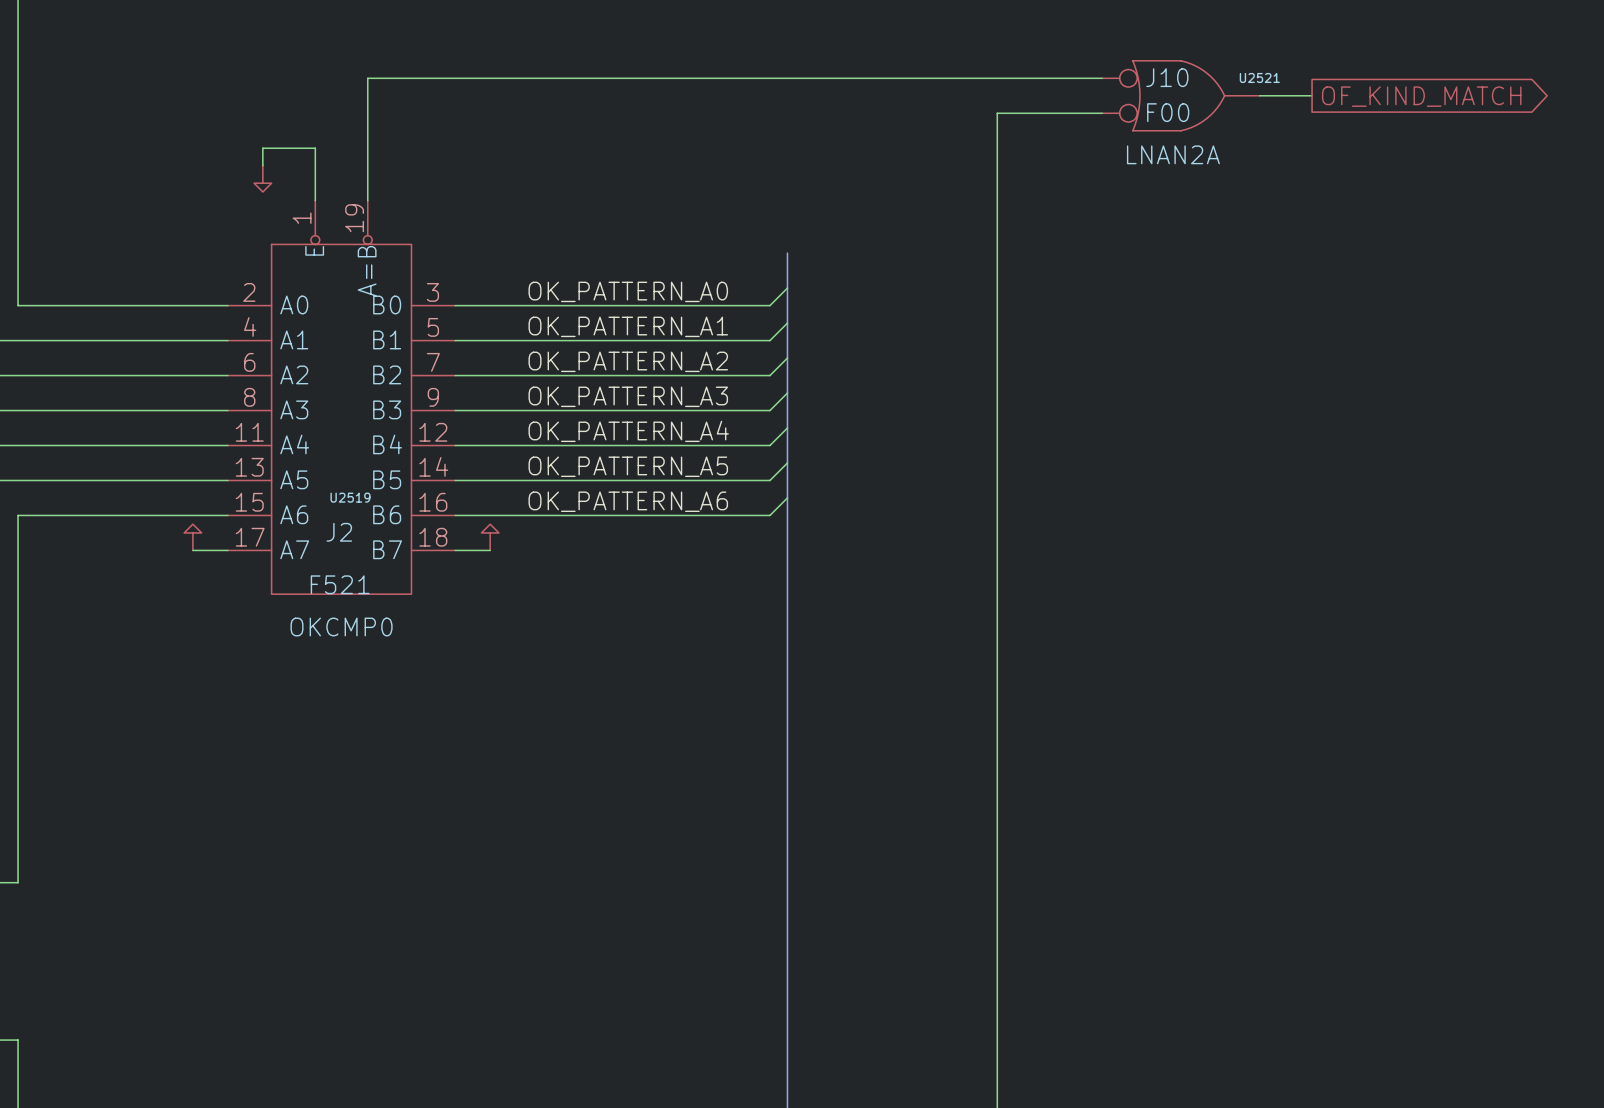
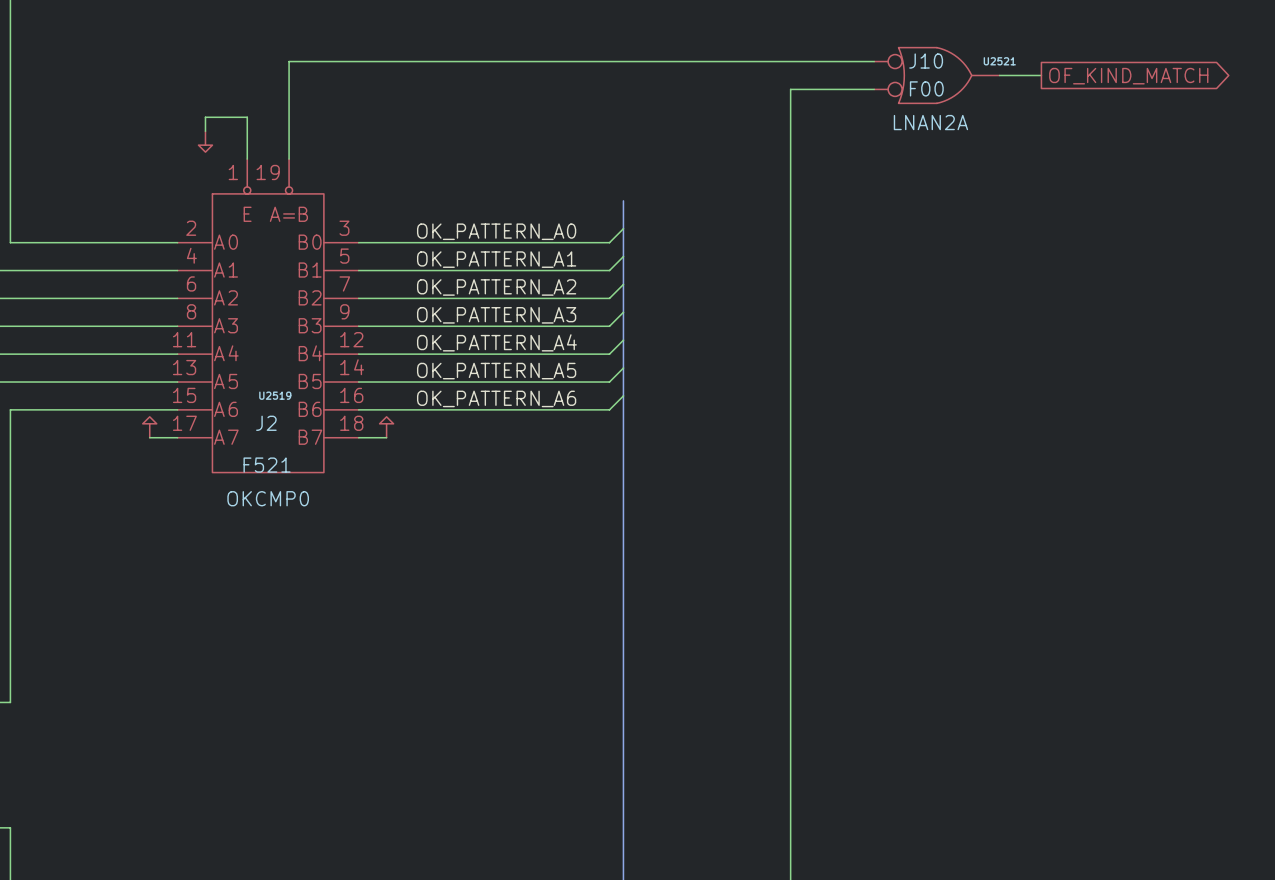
U2519 symbol: [227, 200, 456, 595] -> [177, 159, 359, 473]

